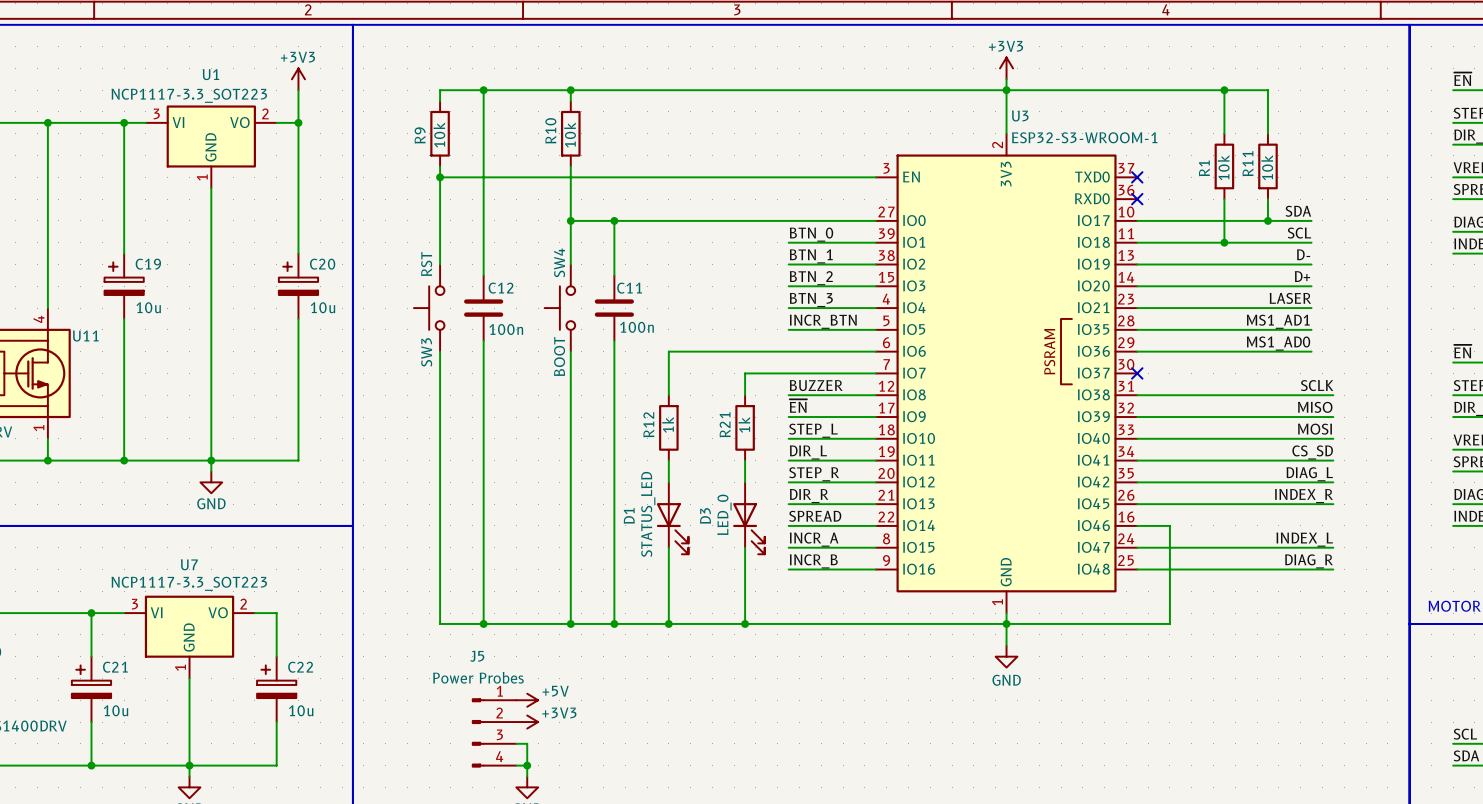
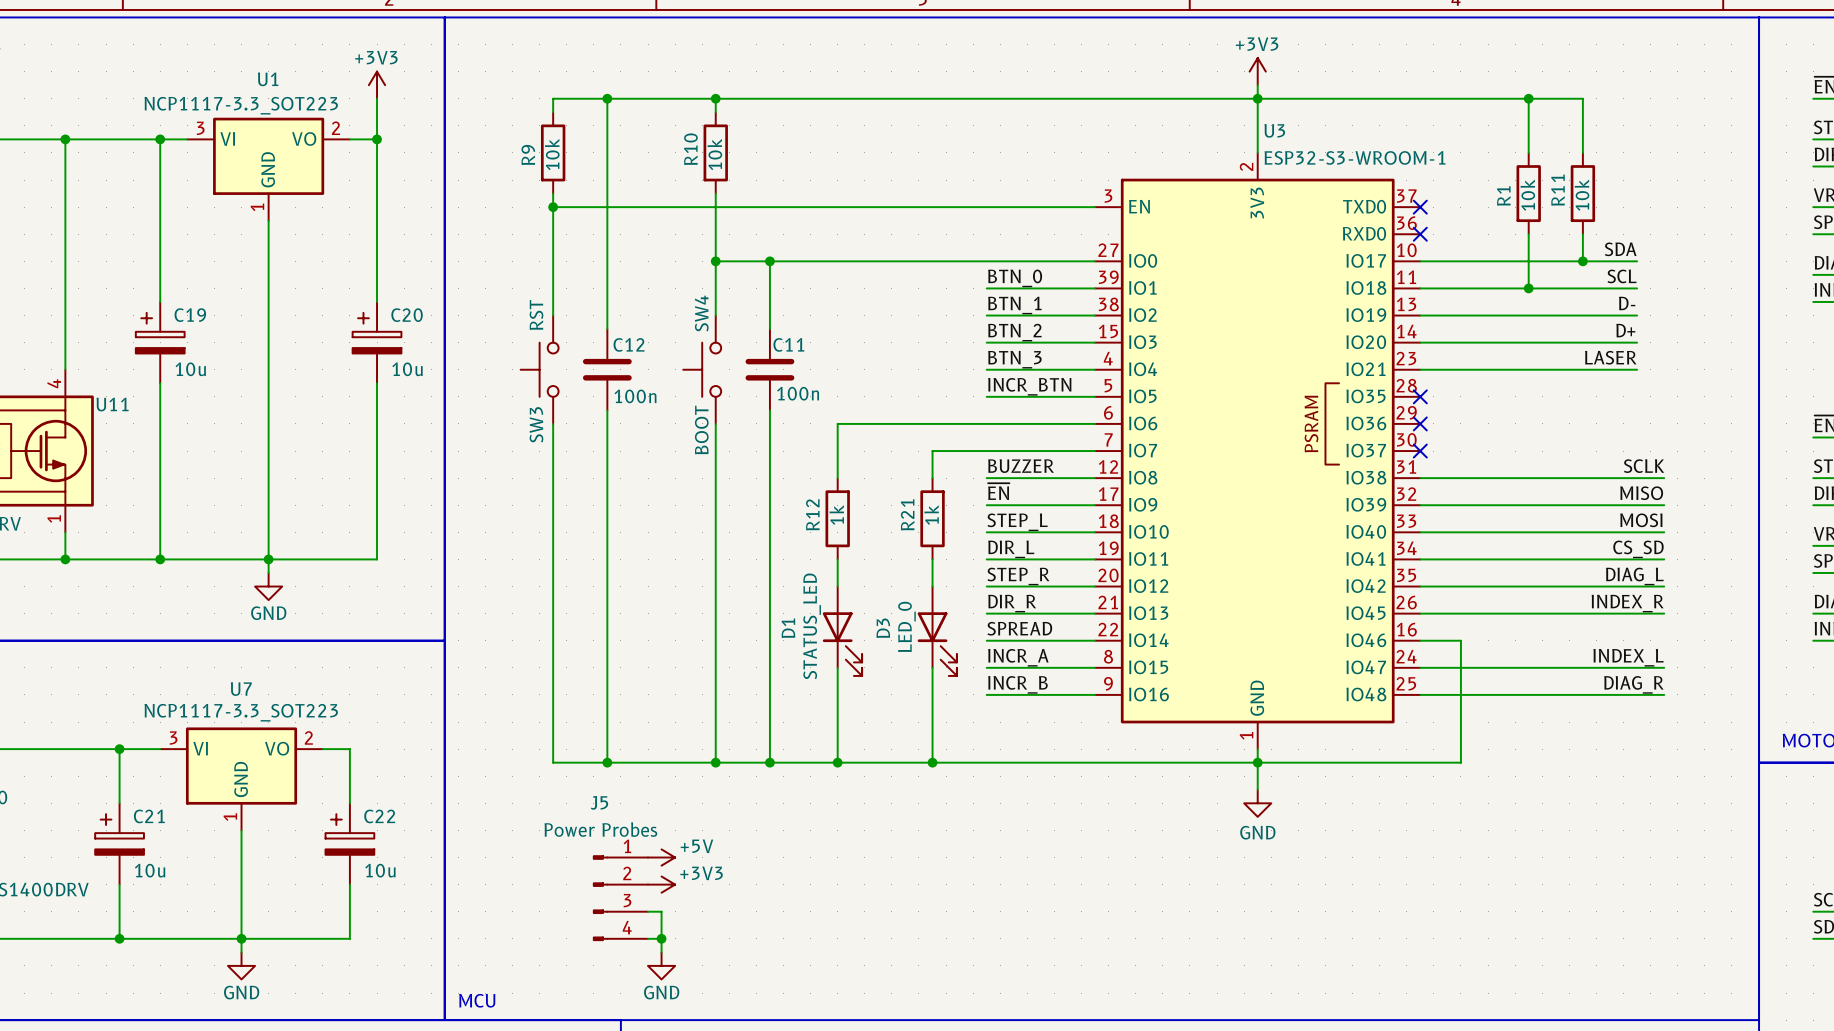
label: MS1_AD1 (1278, 321) -> none
wire: (1137, 329) (1311, 329) -> none
no-connect mark: none -> (1420, 396)
label: MS1_AD0 (1278, 343) -> none
wire: (1137, 351) (1311, 351) -> none
no-connect mark: none -> (1420, 423)

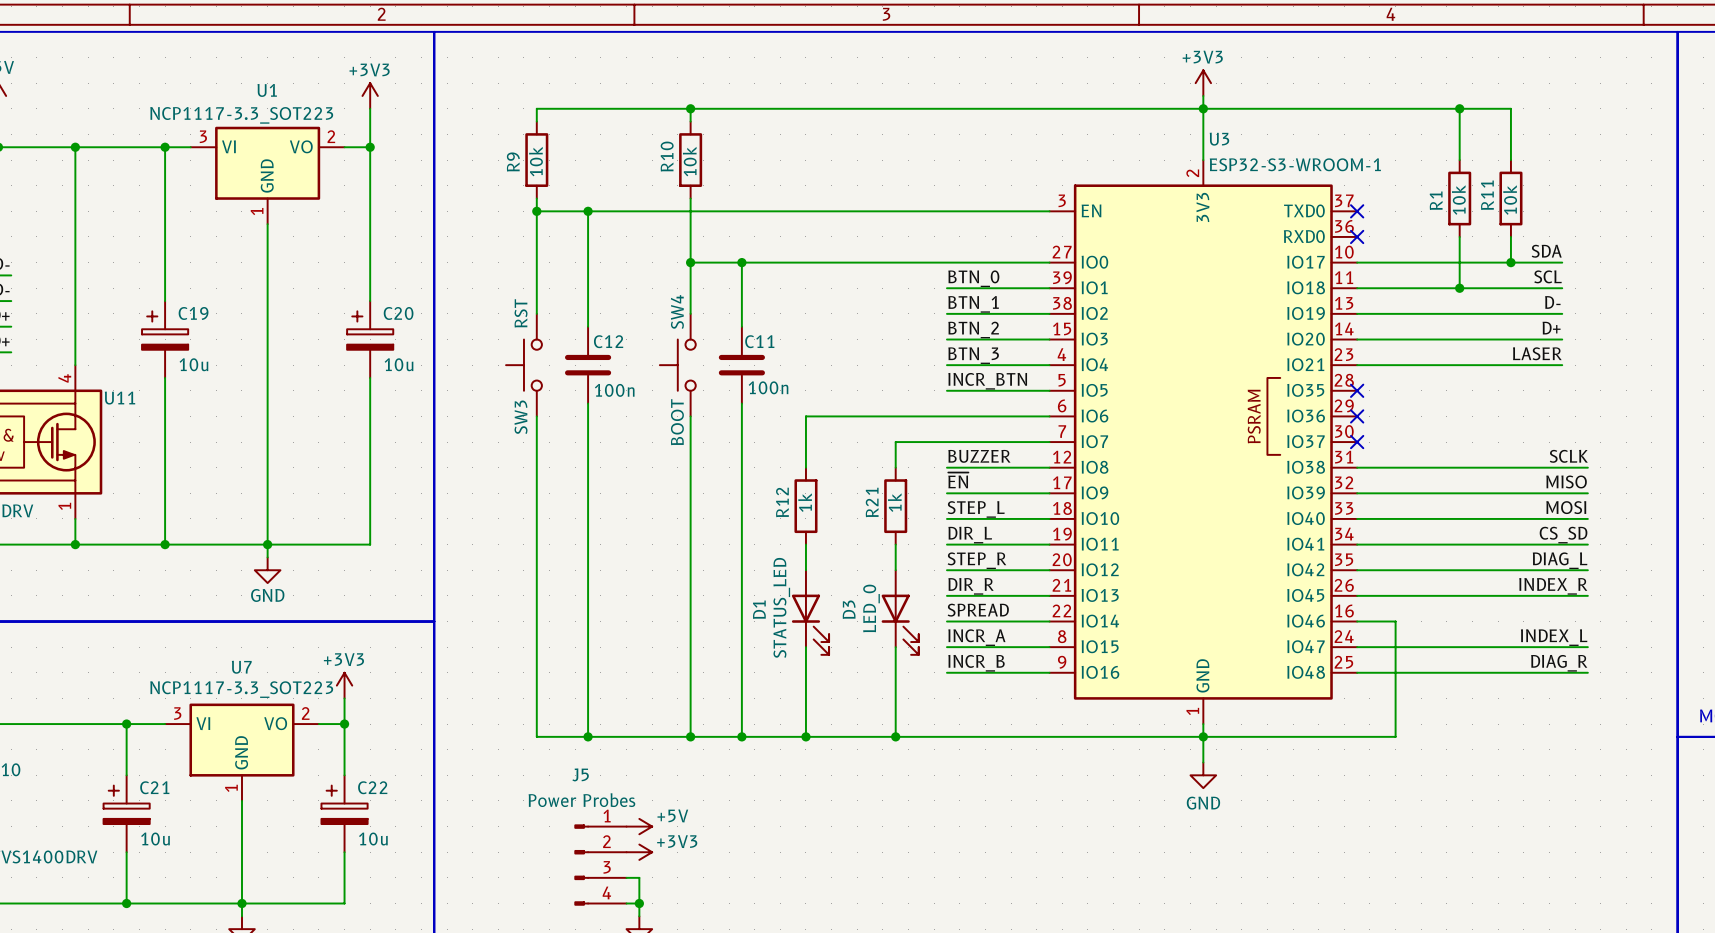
wire: (607, 98) (607, 207) -> none
junction: (607, 98) -> none
junction: none -> (588, 211)
power symbol: none -> +3V3 (344, 685)
wire: none -> (344, 698) (344, 724)
junction: none -> (344, 724)

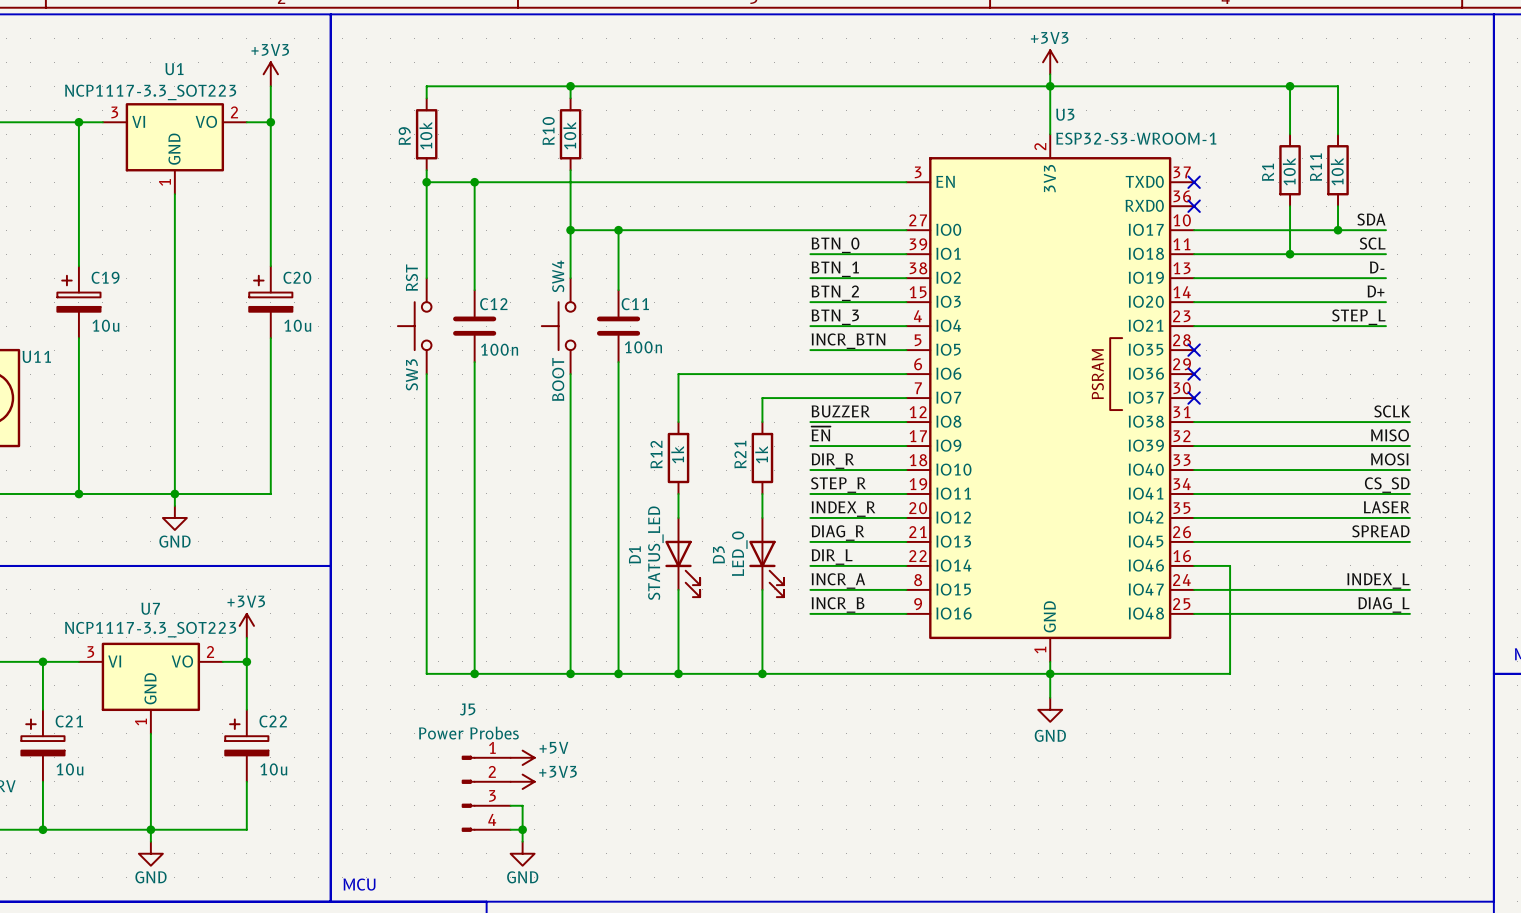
label: LASER (1537, 353) -> STEP_L (1358, 317)
label: STEP_L (976, 509) -> DIR_R (832, 461)
label: DIR_L (970, 535) -> STEP_R (838, 485)
label: STEP_R (976, 560) -> INDEX_R (843, 509)
label: DIAG_L (1560, 560) -> LASER (1386, 507)
label: DIR_R (971, 586) -> DIAG_R (838, 533)
label: INDEX_R (1553, 586) -> SPREAD (1380, 531)
label: SPREAD (978, 610) -> DIR_L (832, 557)
label: DIAG_R (1559, 663) -> DIAG_L (1383, 605)

